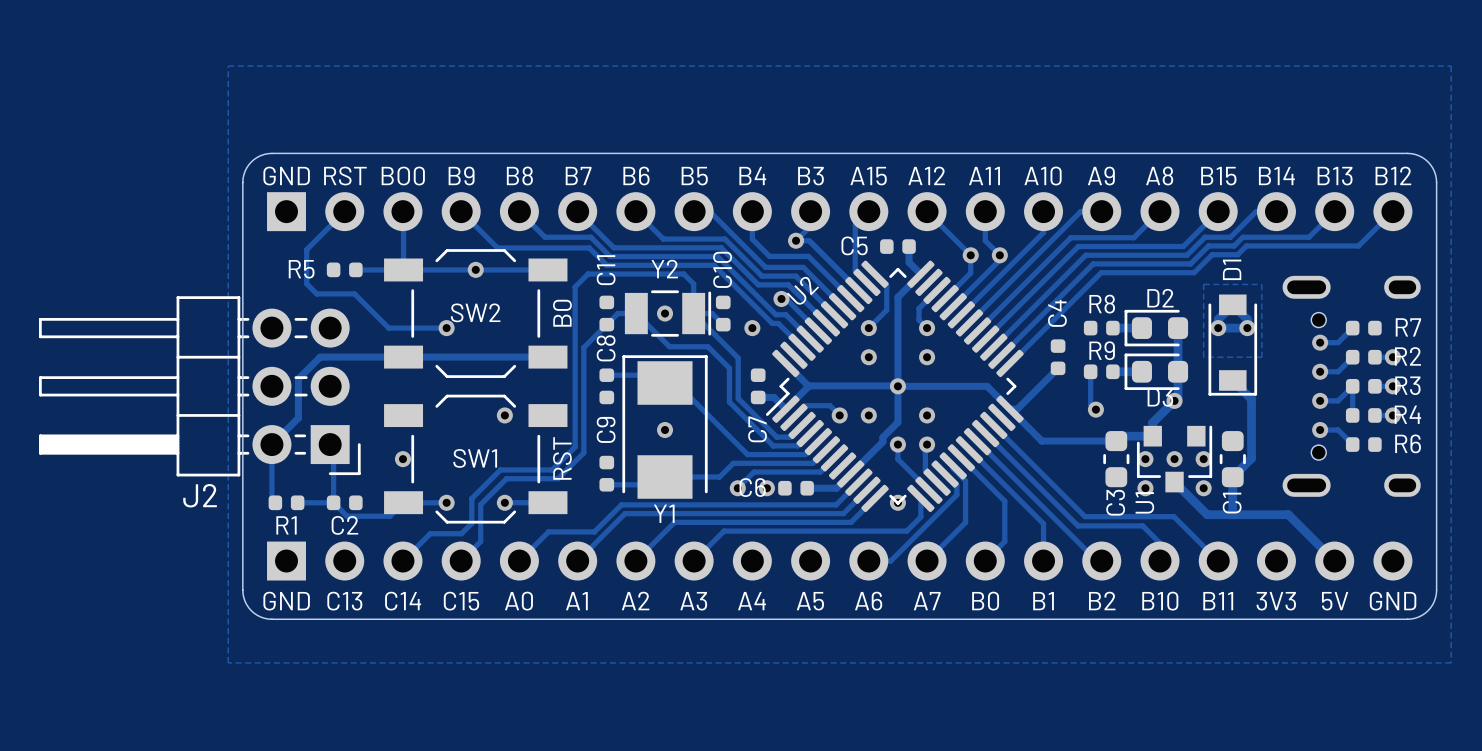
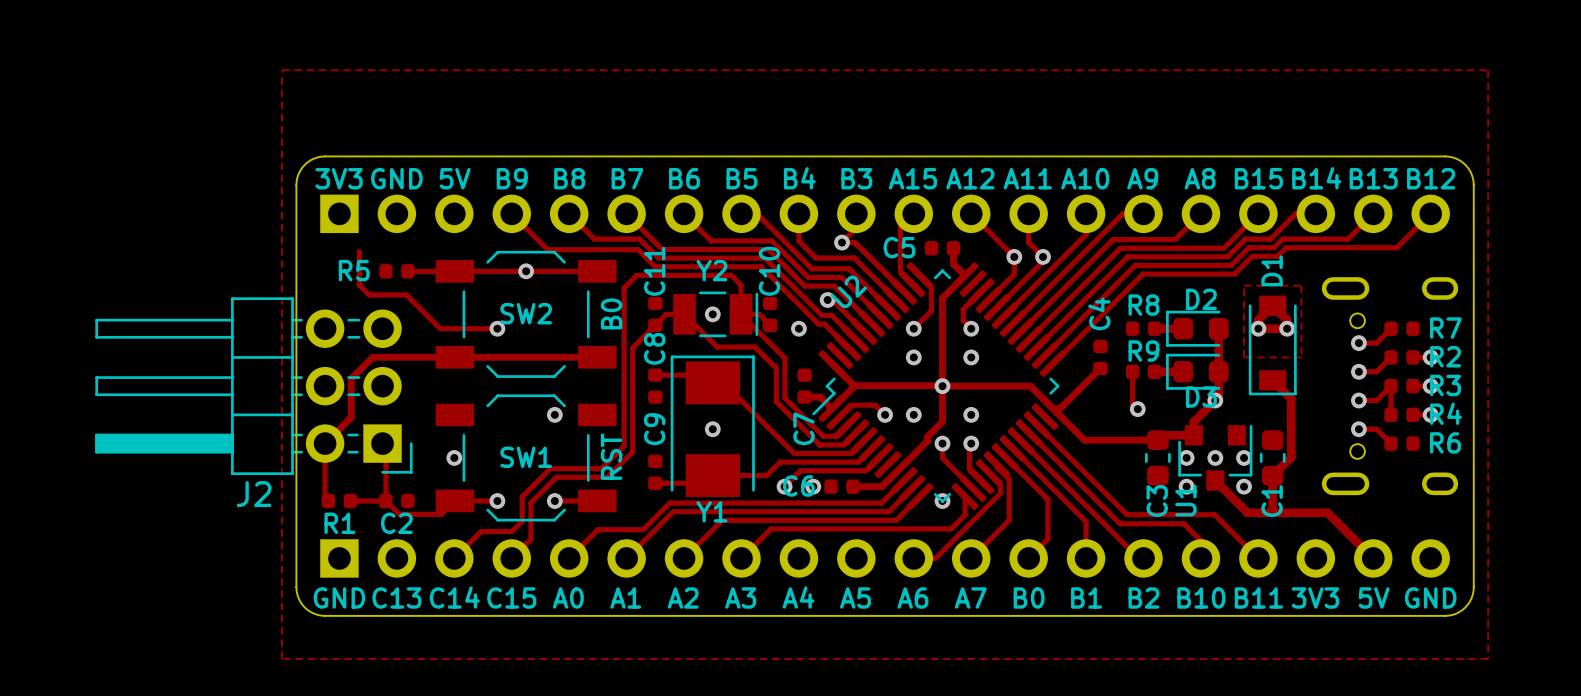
text: GND (286, 176) -> 3V3 (339, 178)
text: RST (345, 176) -> GND (396, 178)
text: BO0 (403, 176) -> 5V (455, 178)
track: (344, 211) (306, 249) -> none
track: (403, 212) (403, 269) -> none

